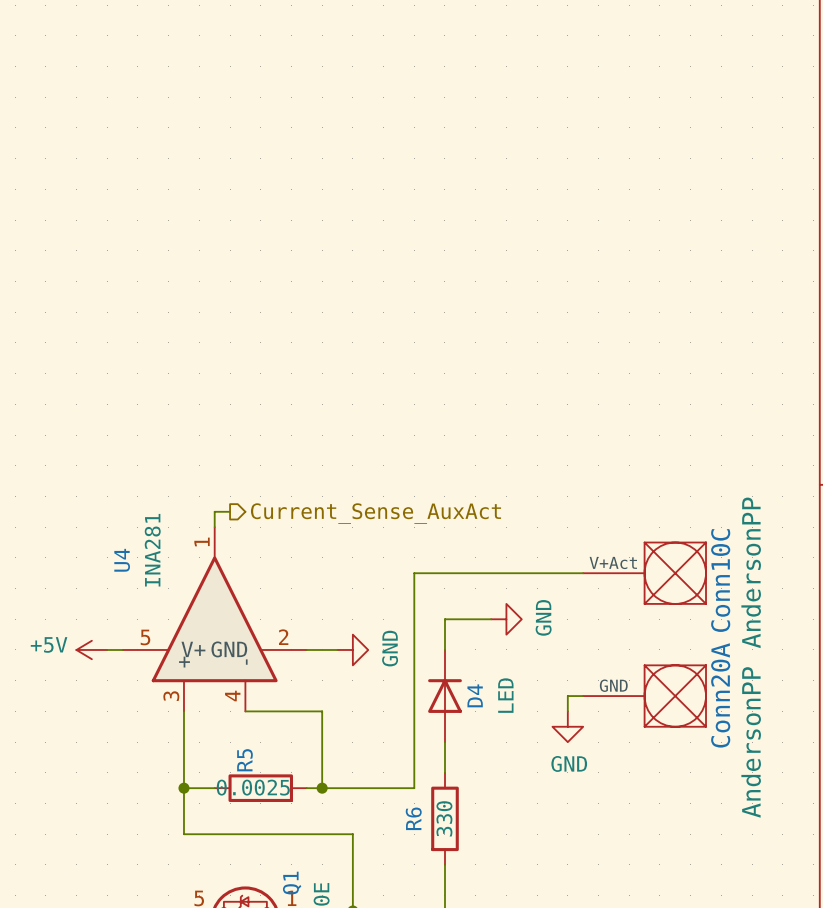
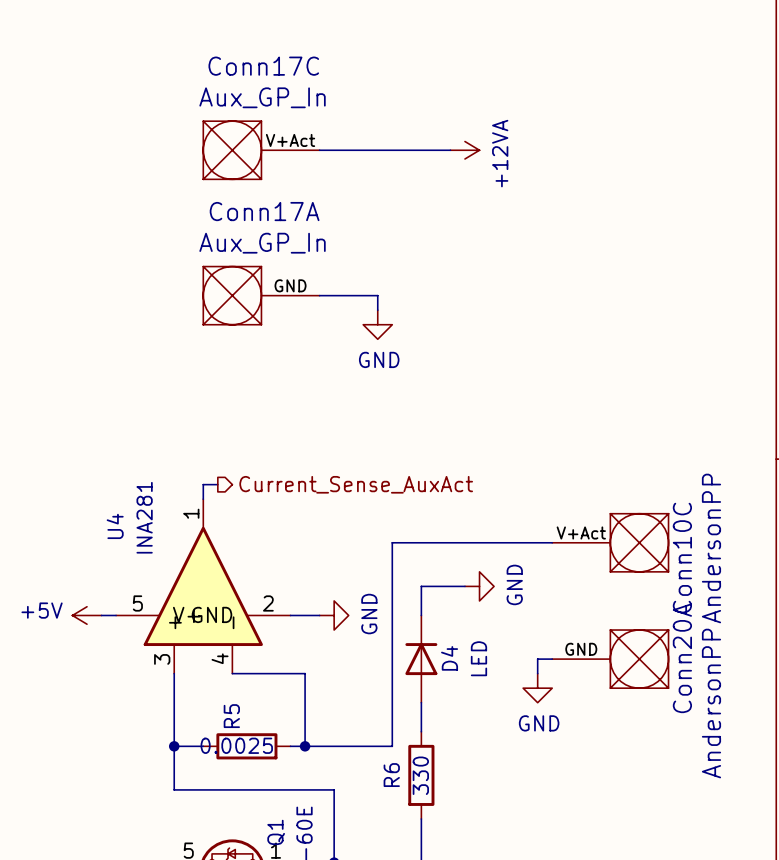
Conn17C: none -> Aux_GP_In (261, 150)
wire: none -> (319, 150) (450, 150)
power symbol: none -> +12VA (464, 150)
Conn17A: none -> Aux_GP_In (261, 295)
wire: none -> (319, 295) (377, 295) (377, 310)
power symbol: none -> GND (377, 324)

